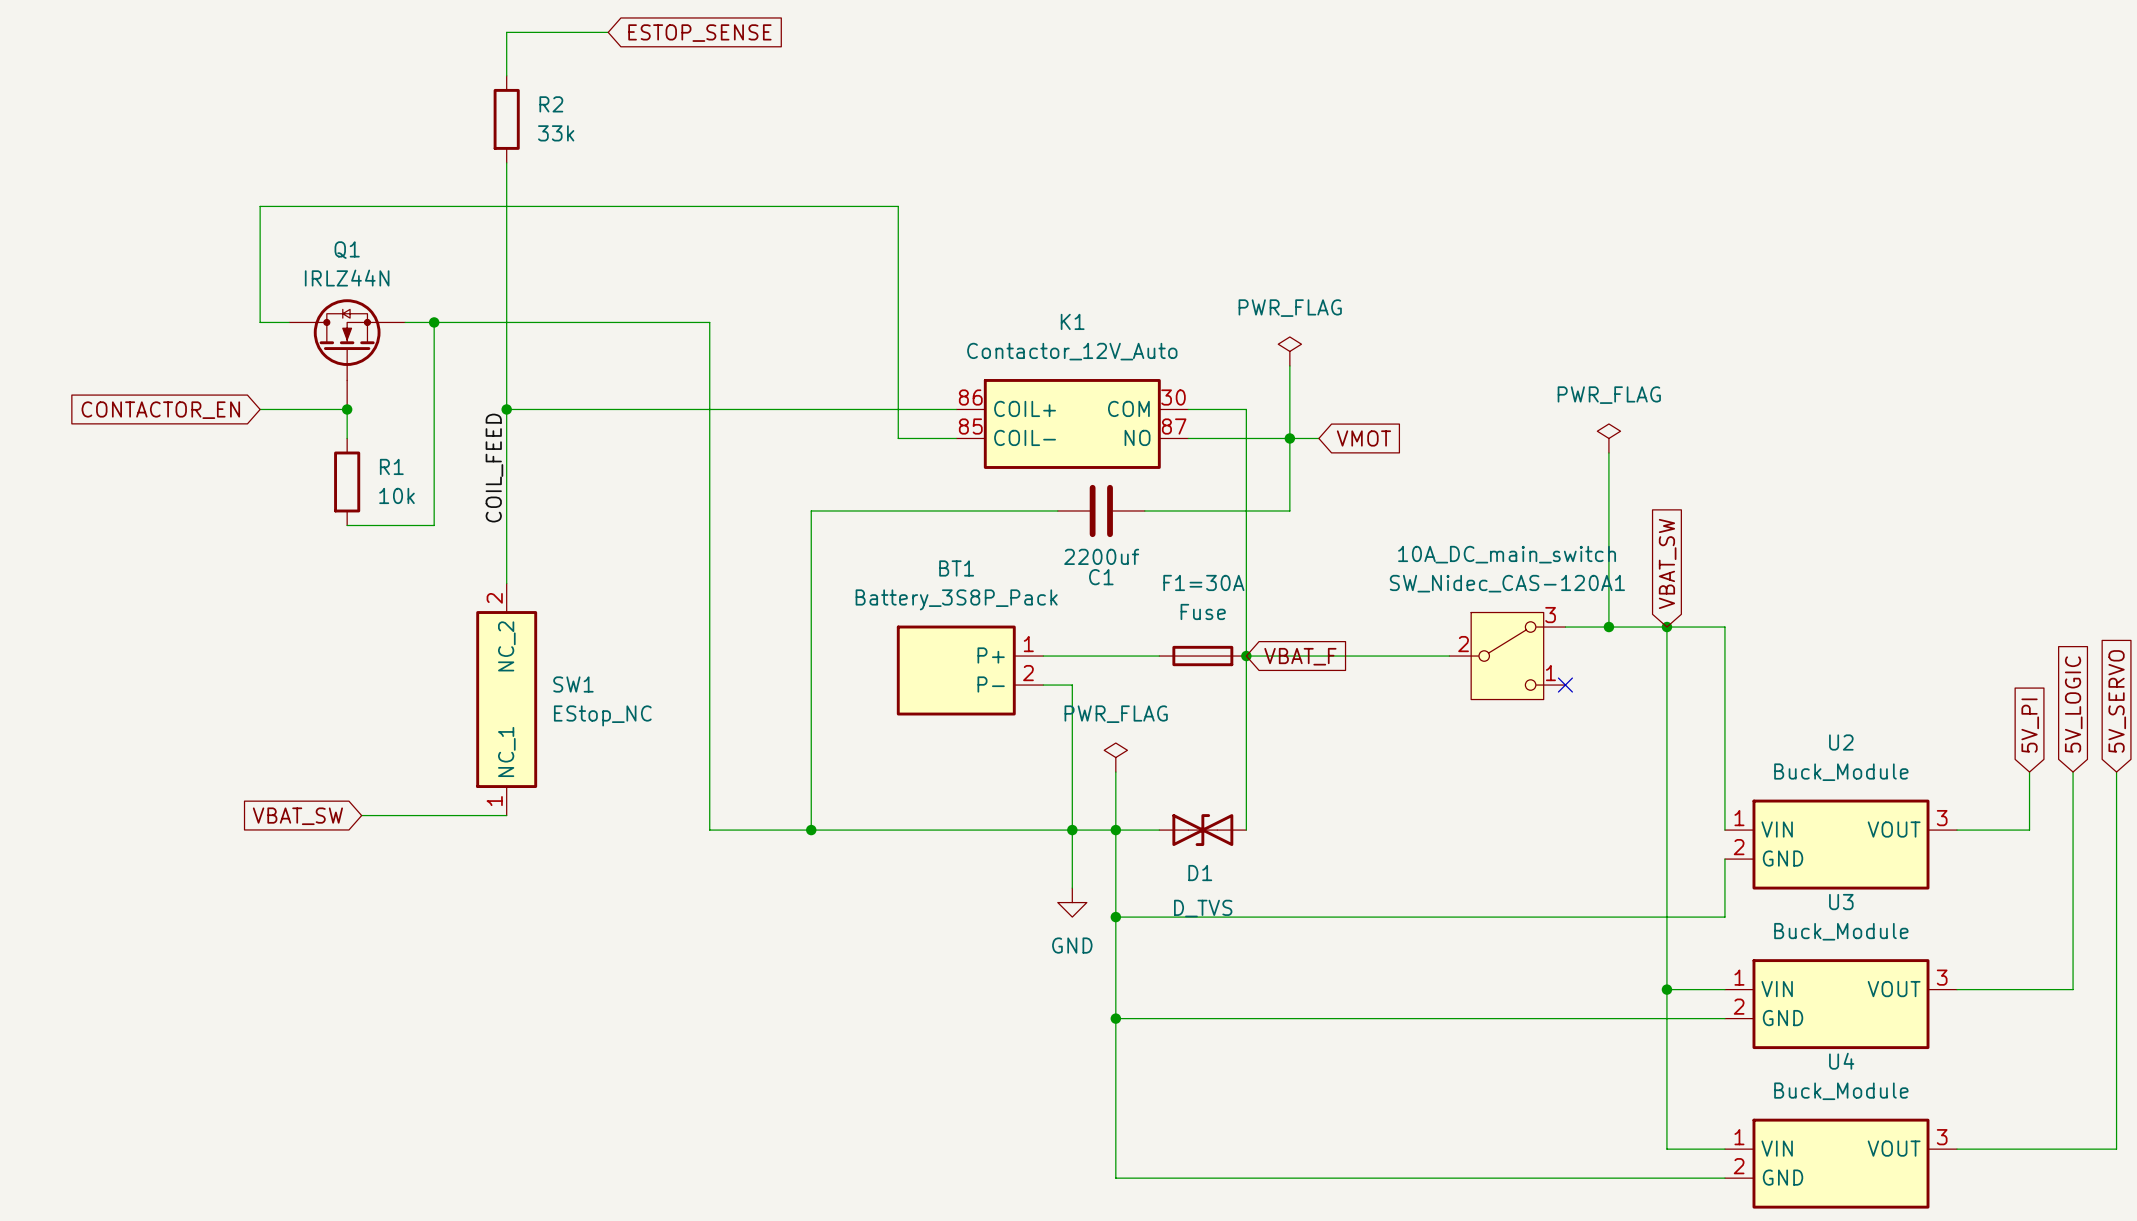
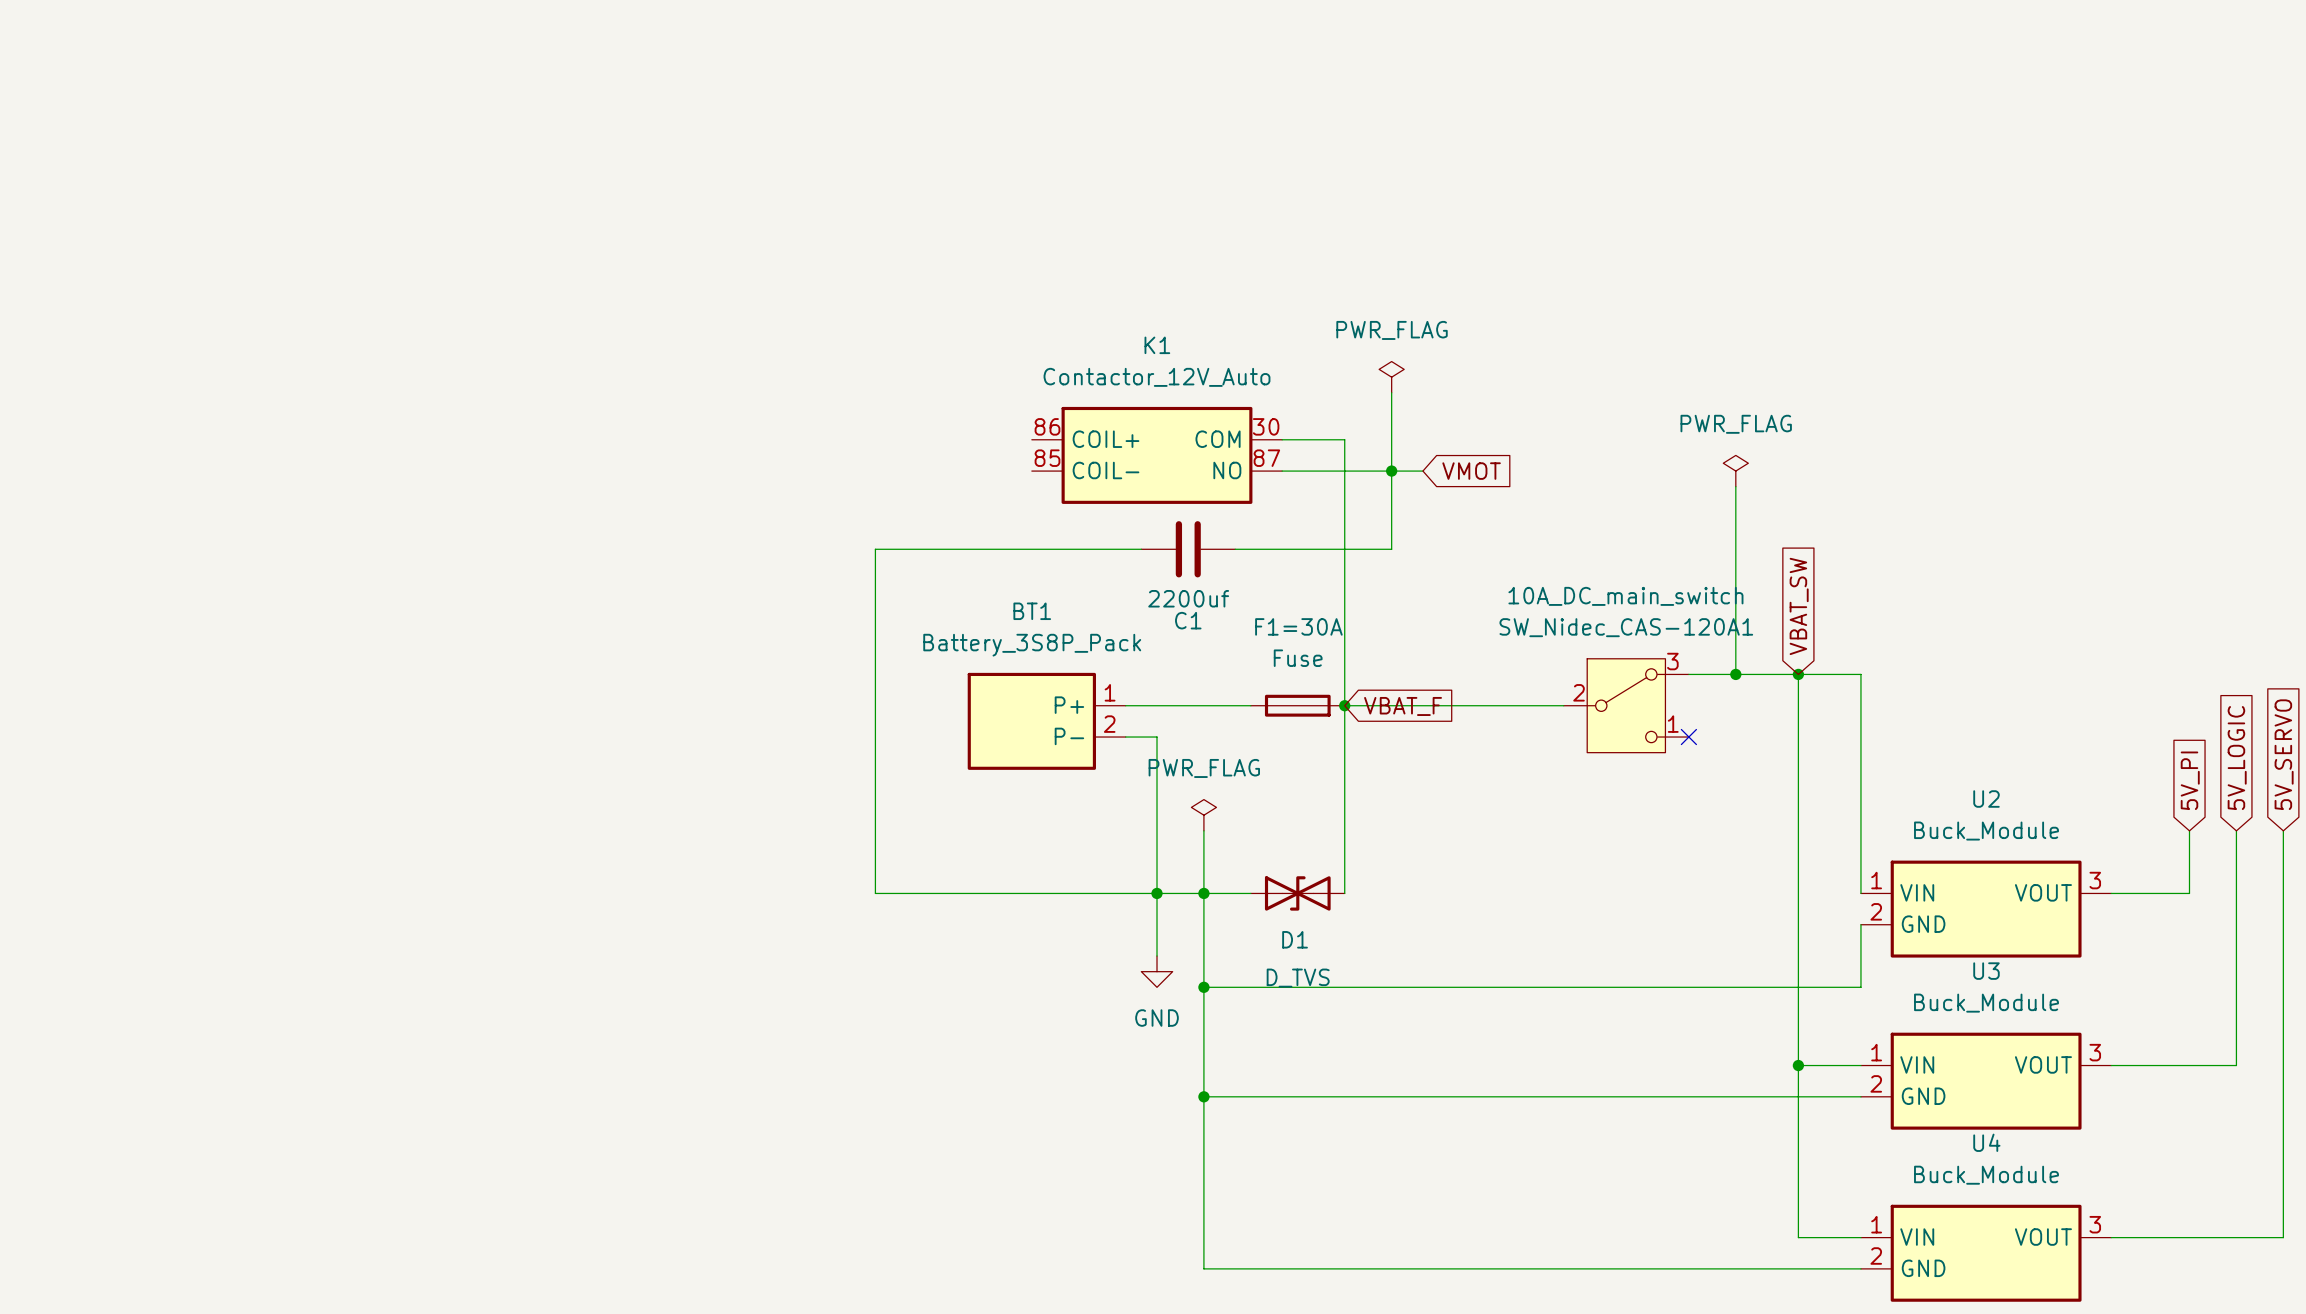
wire: (608, 32) (506, 32) (506, 75) -> none
global label: ESTOP_SENSE (699, 33) -> none
R2: 33k (506, 119) -> none
wire: (506, 162) (506, 583) -> none
wire: (289, 322) (260, 322) (260, 206) (898, 206) (898, 438) (956, 438) -> none
wire: (405, 322) (709, 322) (709, 830) (811, 830) -> none
wire: (434, 322) (434, 525) (347, 525) -> none
junction: (434, 322) -> none
Q1: IRLZ44N (347, 354) -> none
wire: (260, 409) (347, 409) (347, 438) -> none
junction: (347, 409) -> none
wire: (506, 409) (956, 409) -> none
junction: (506, 409) -> none
global label: CONTACTOR_EN (160, 410) -> none
label: COIL_FEED (494, 468) -> none
R1: 10k (347, 481) -> none
SW1: EStop_NC (506, 699) -> none
wire: (361, 815) (506, 815) -> none
global label: VBAT_SW (297, 816) -> none
junction: (811, 830) -> none

